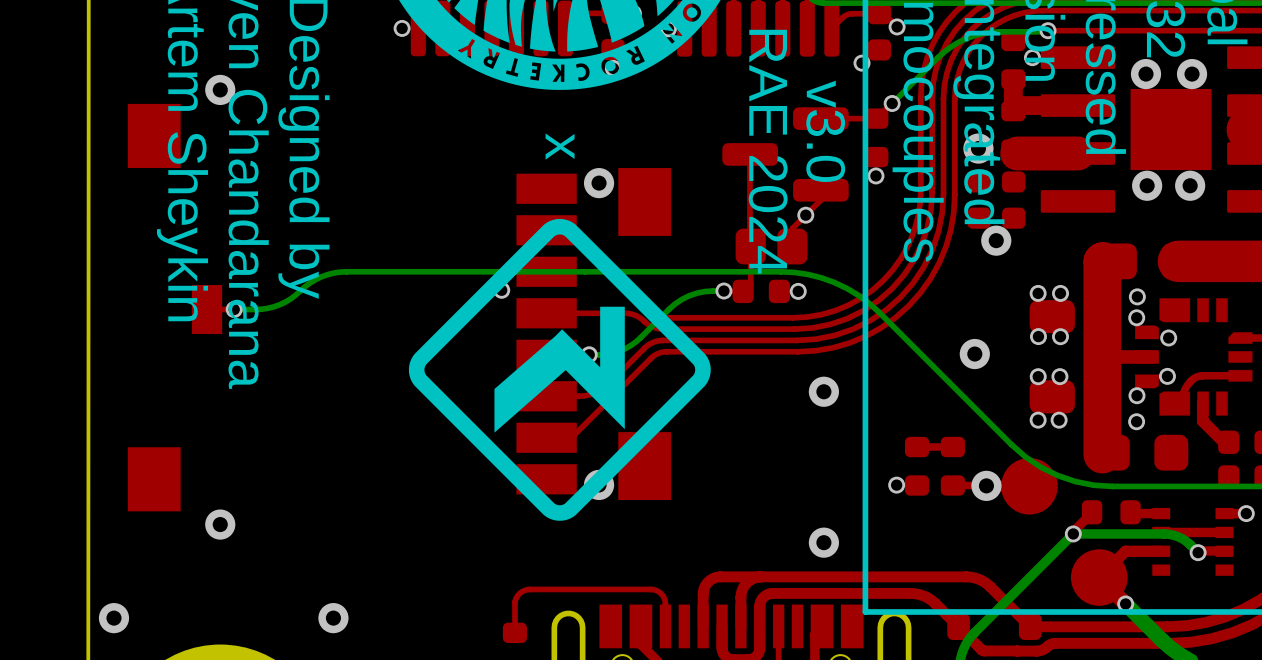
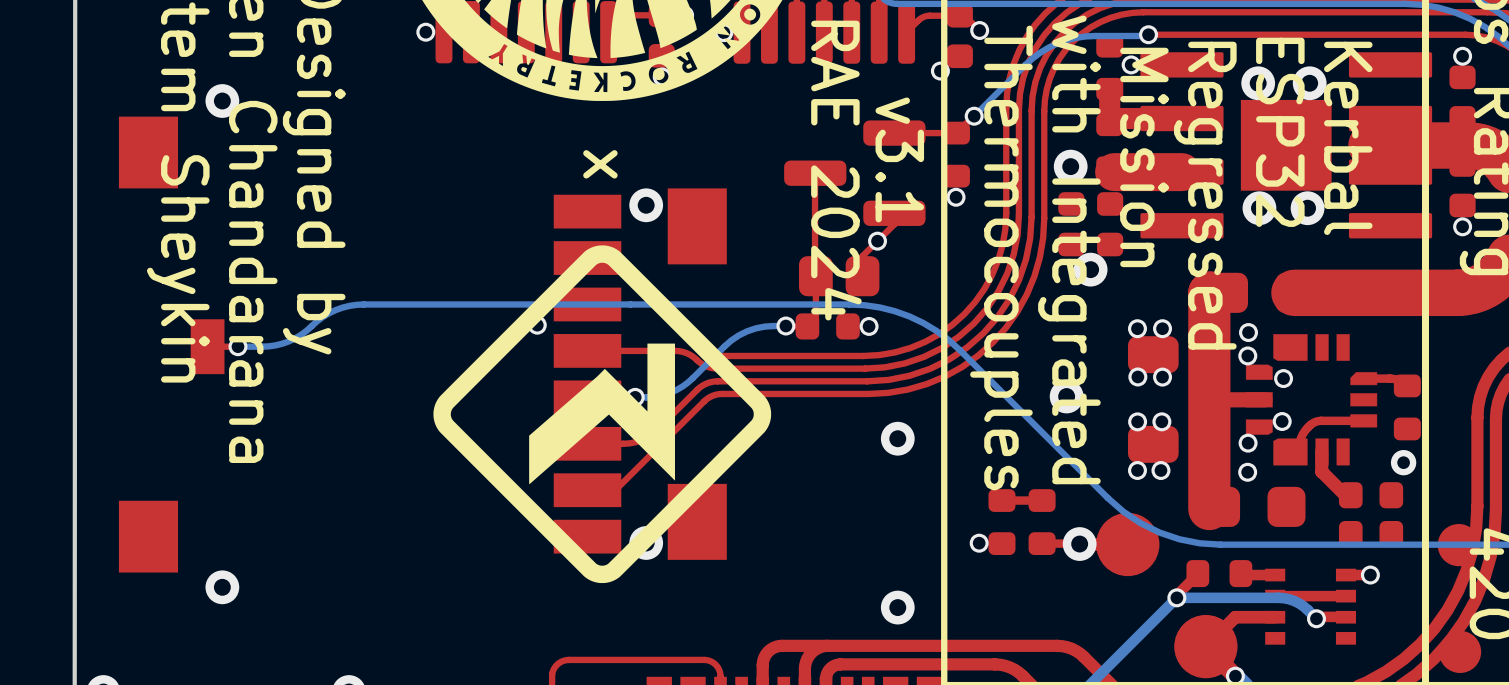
text: v3.0 (825, 131) -> v3.1 (899, 159)

